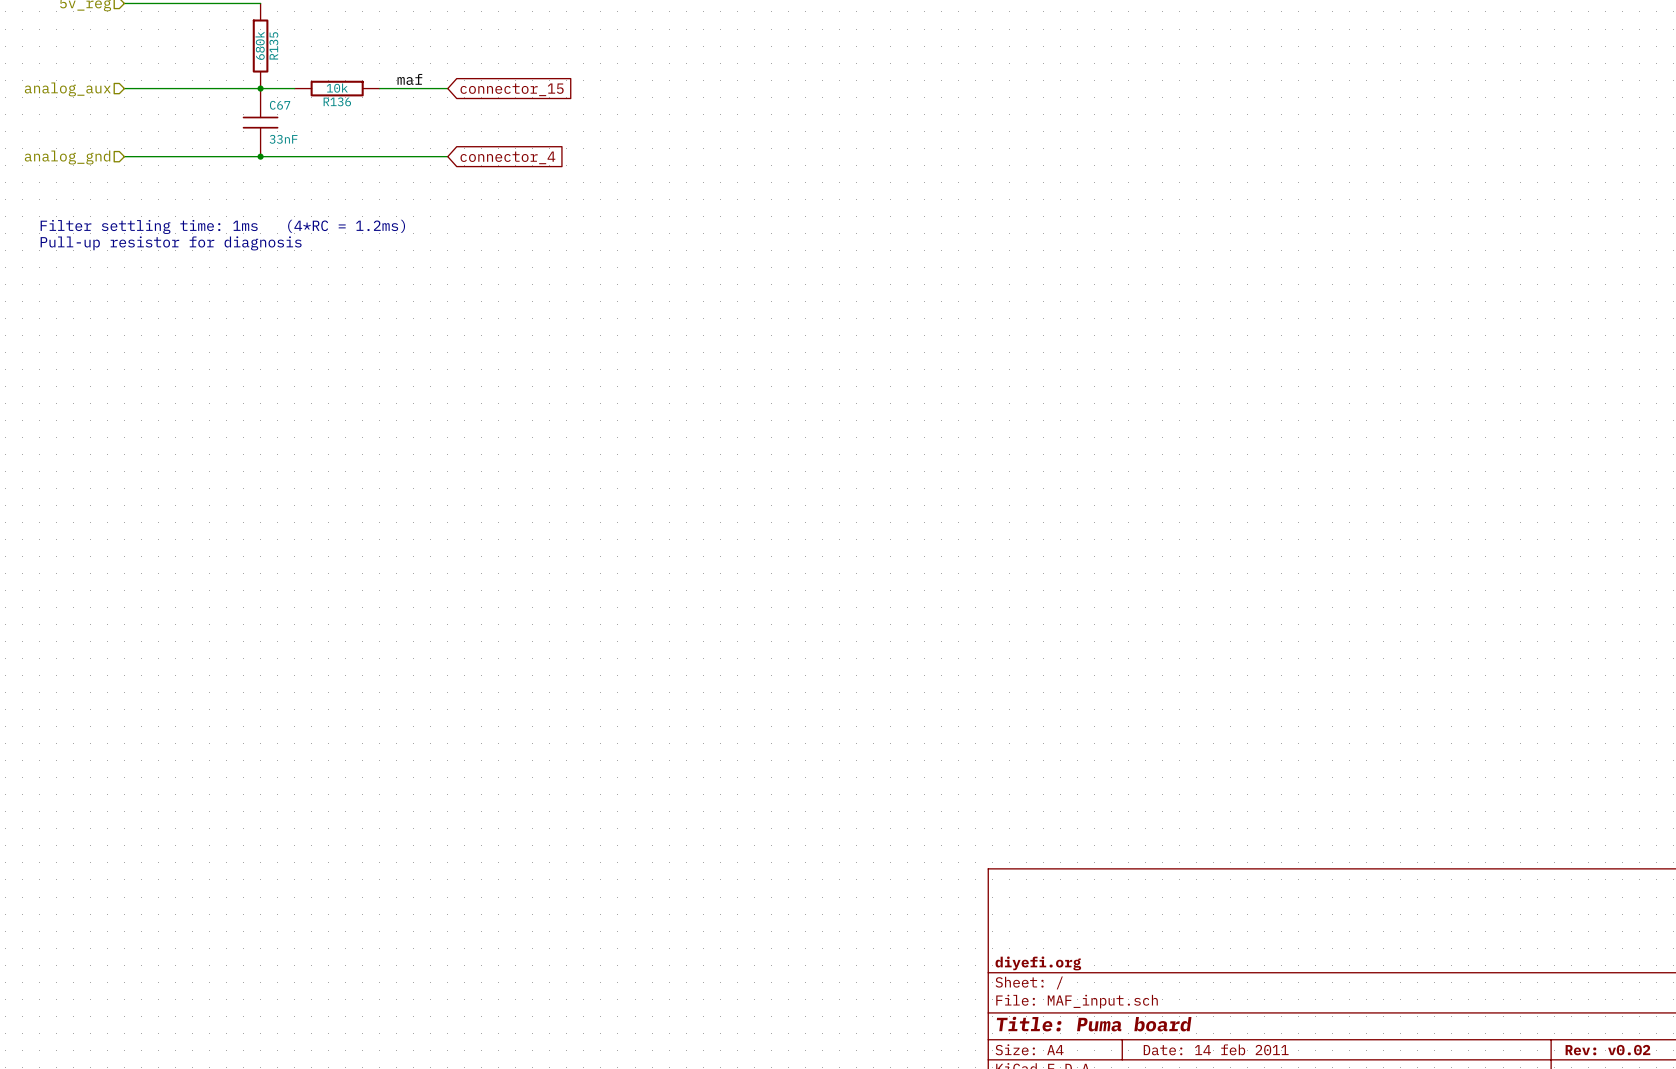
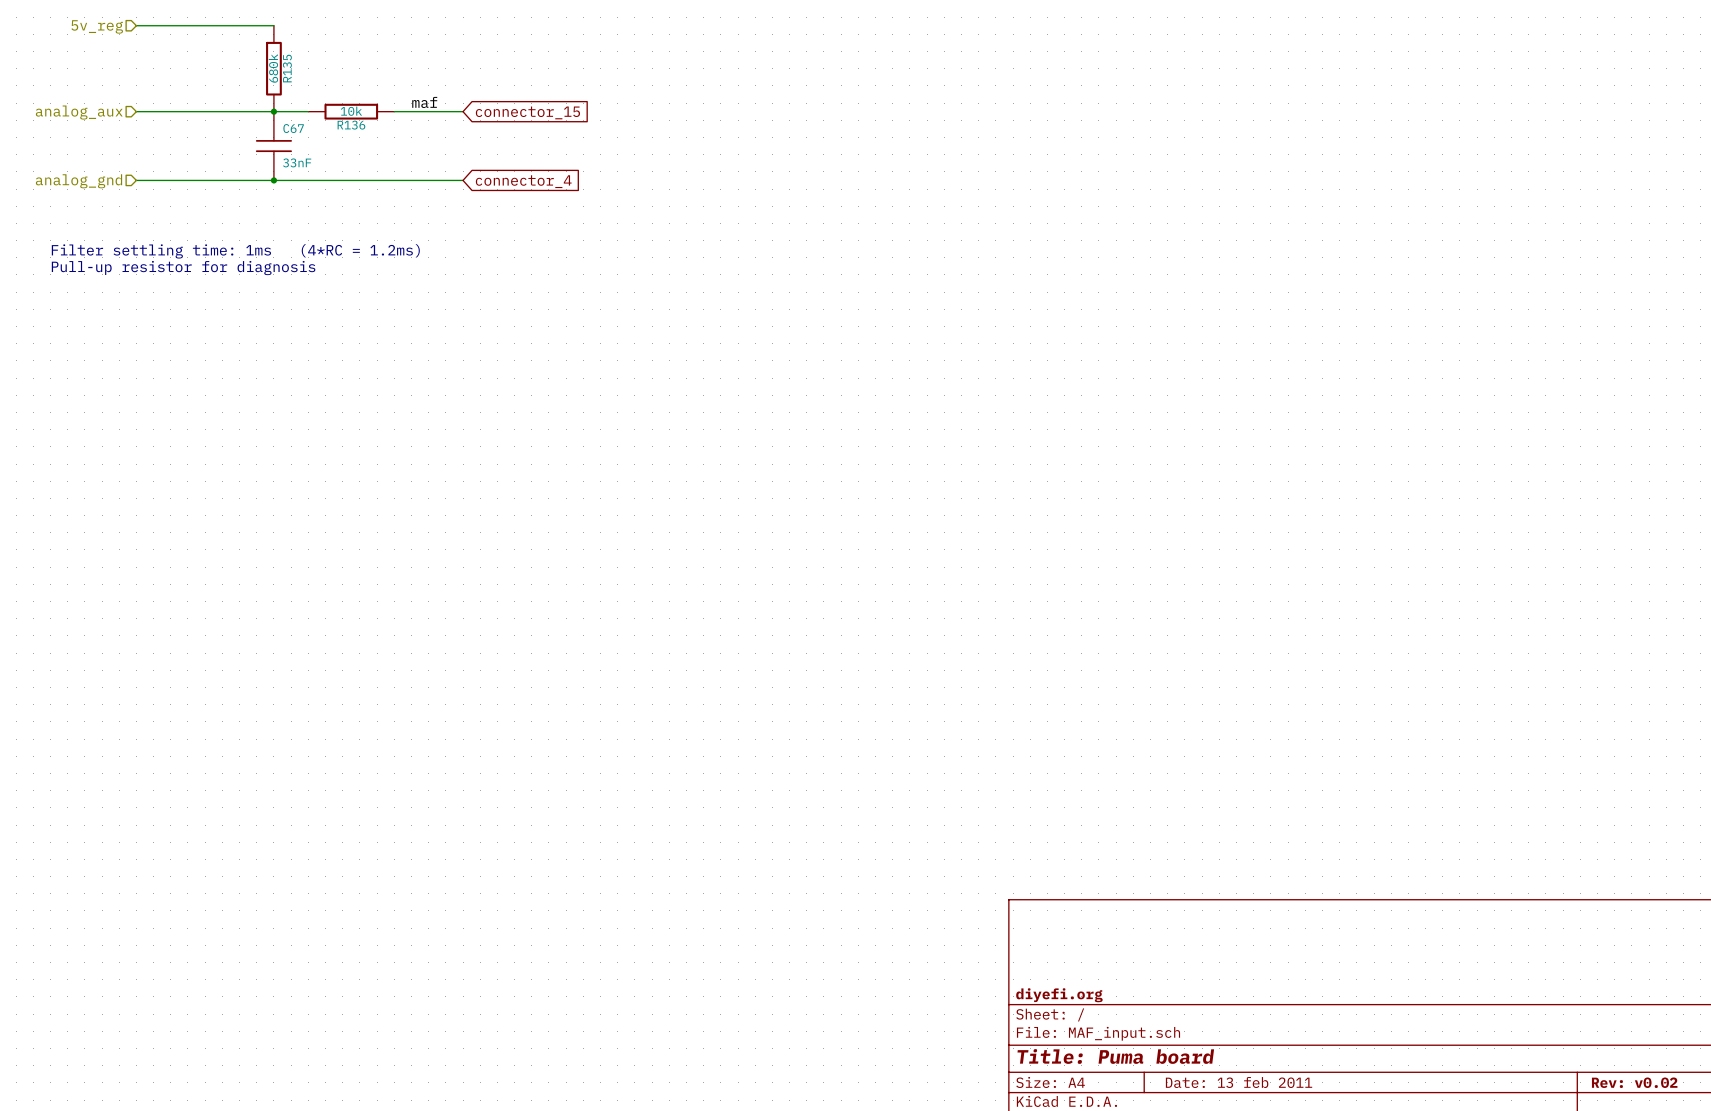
title block: Date: 14 feb 2011 (1216, 1049) -> Date: 13 feb 2011 (1239, 1082)

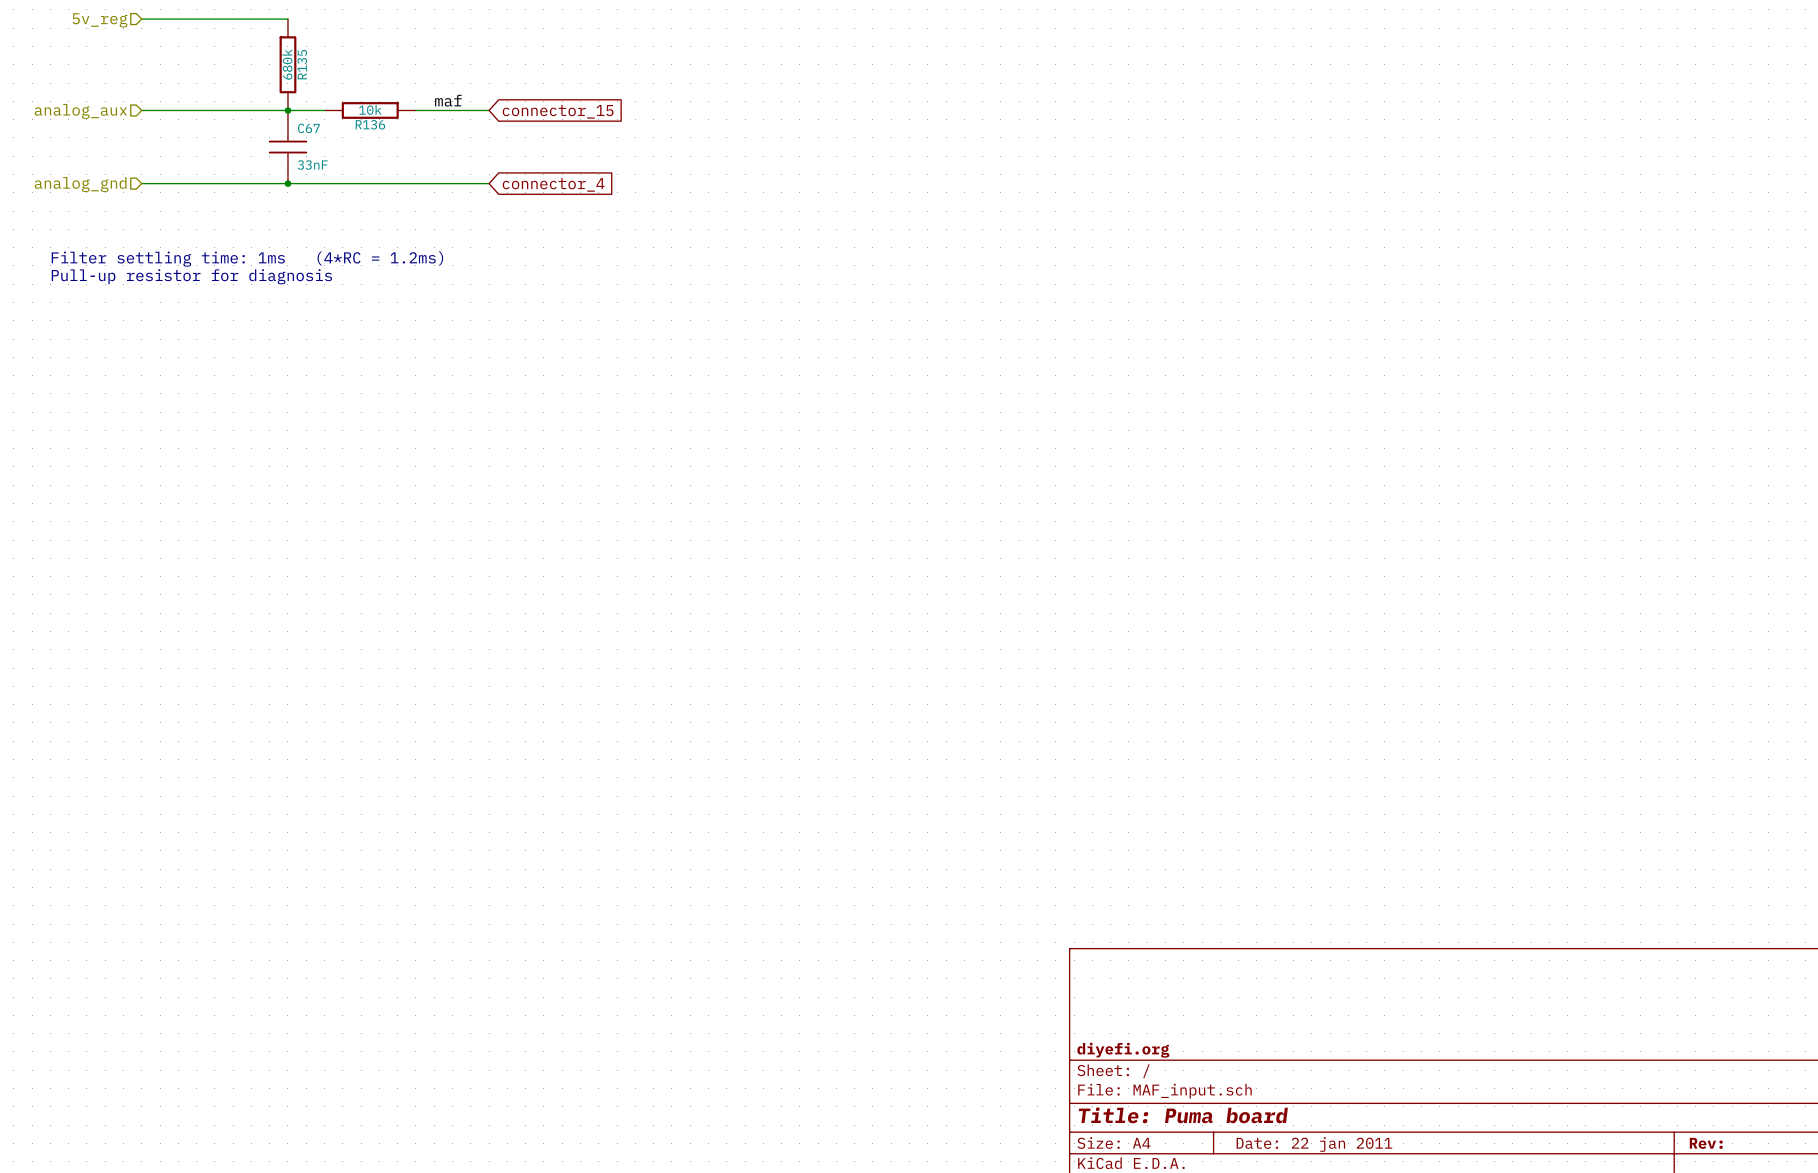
title block: Date: 13 feb 2011 (1239, 1082) -> Date: 22 jan 2011 (1314, 1144)
title block: Rev: v0.02 (1634, 1082) -> Rev: (1706, 1143)

